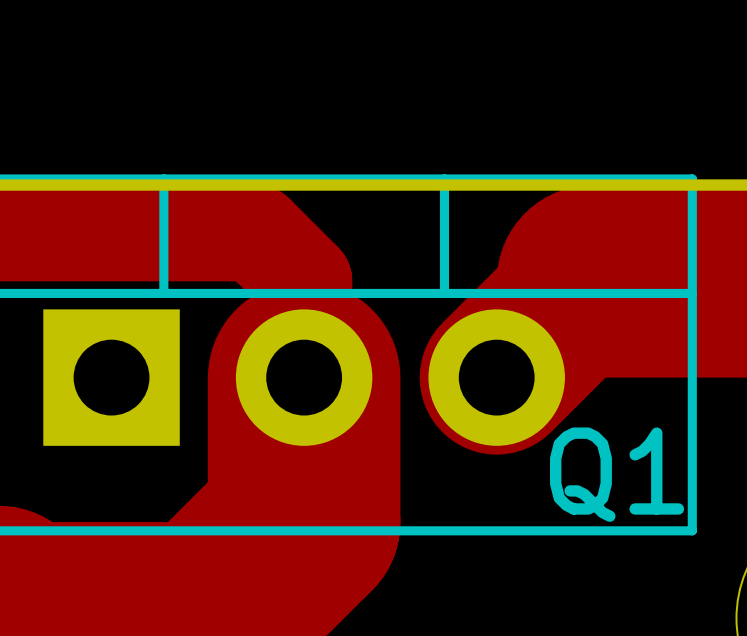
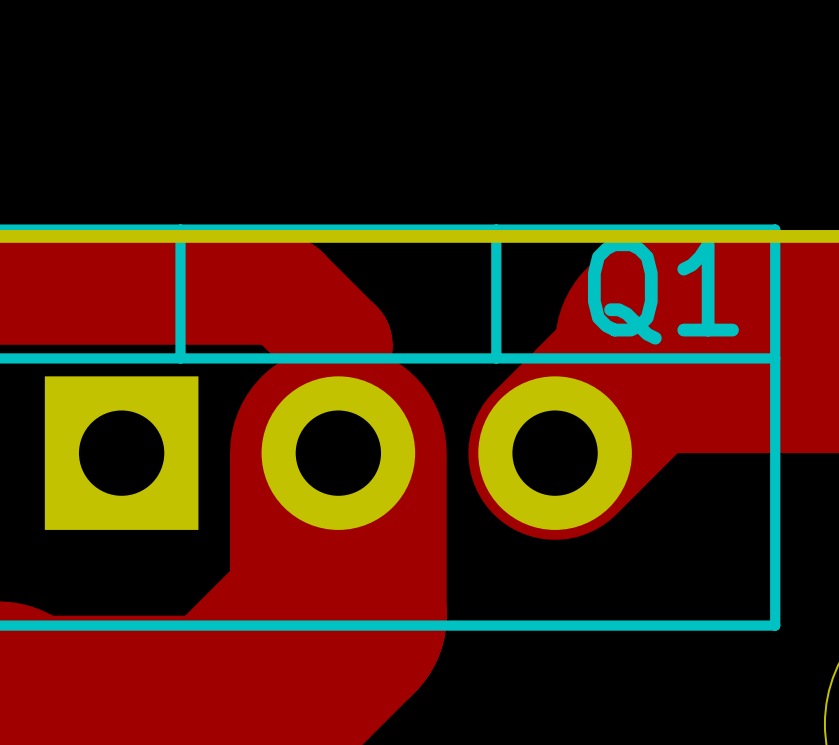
Q1 name position: Q1 (617, 474) -> Q1 (663, 291)

